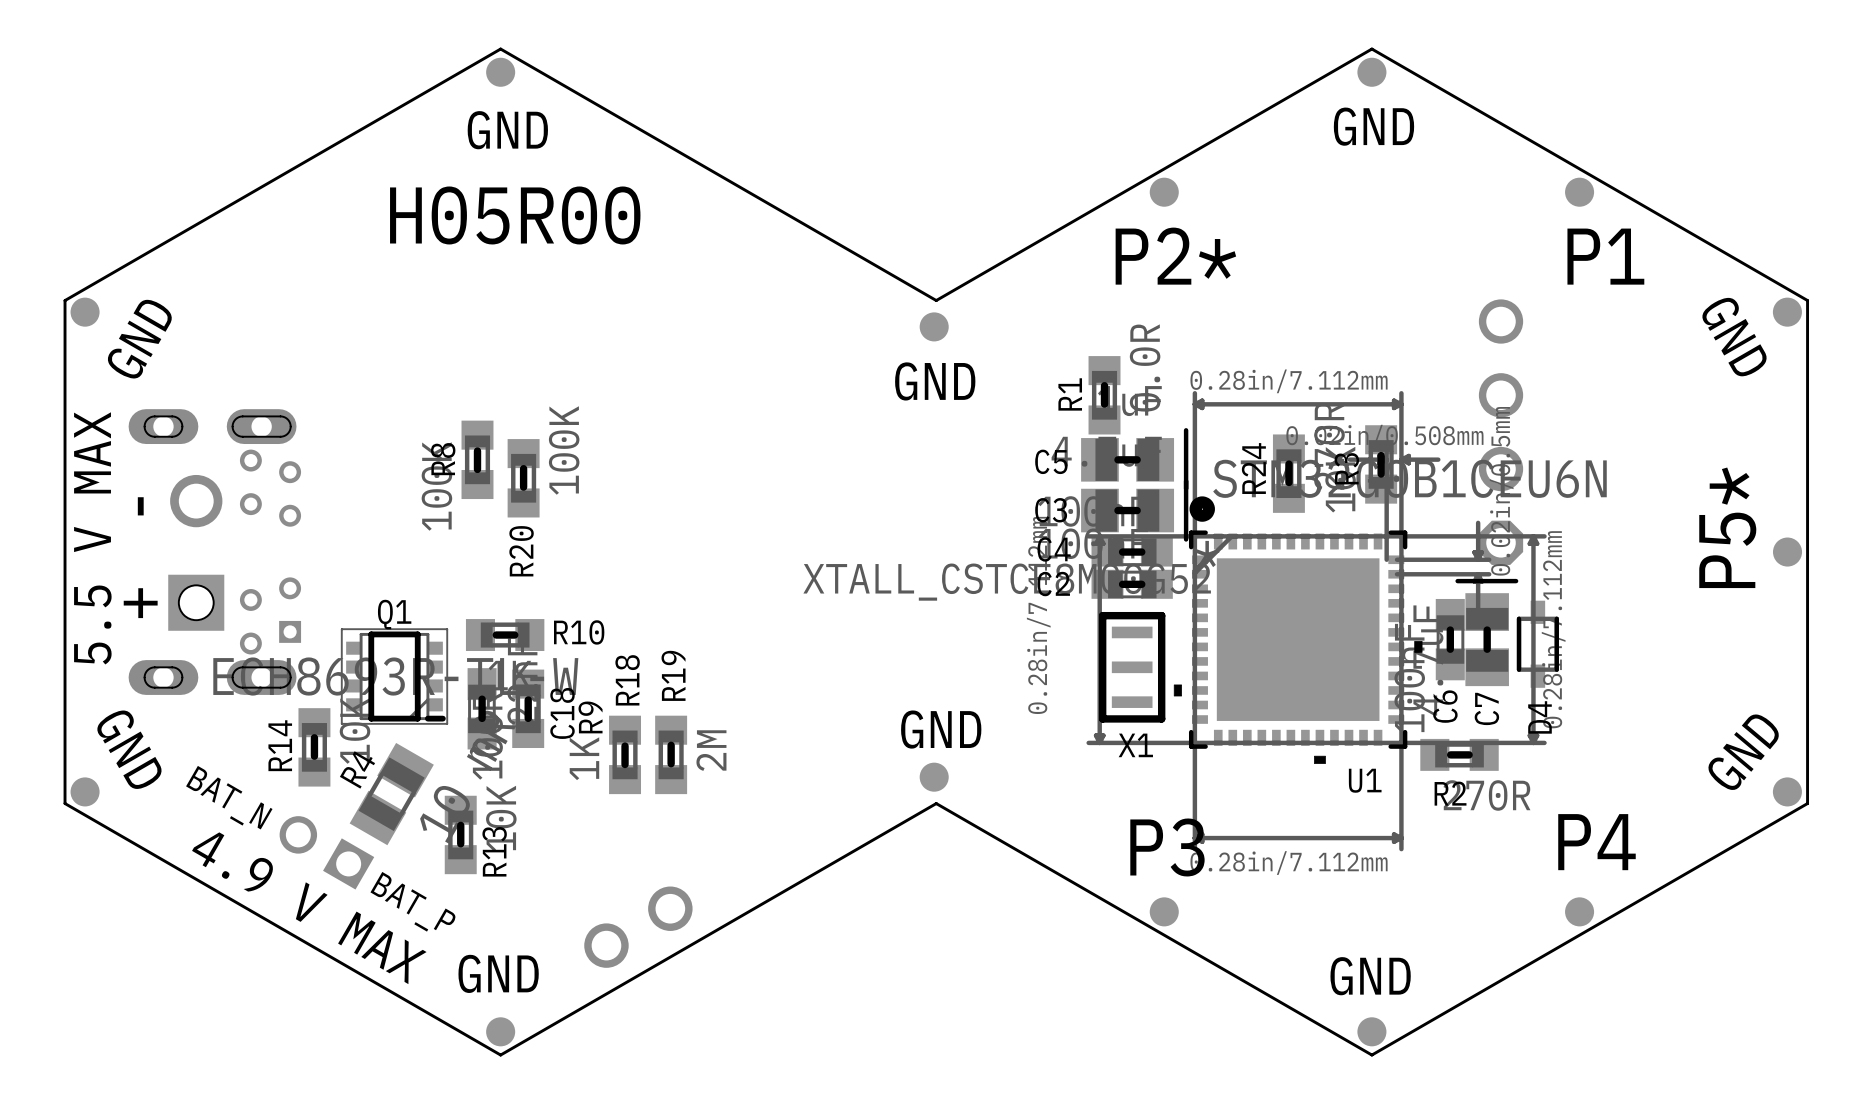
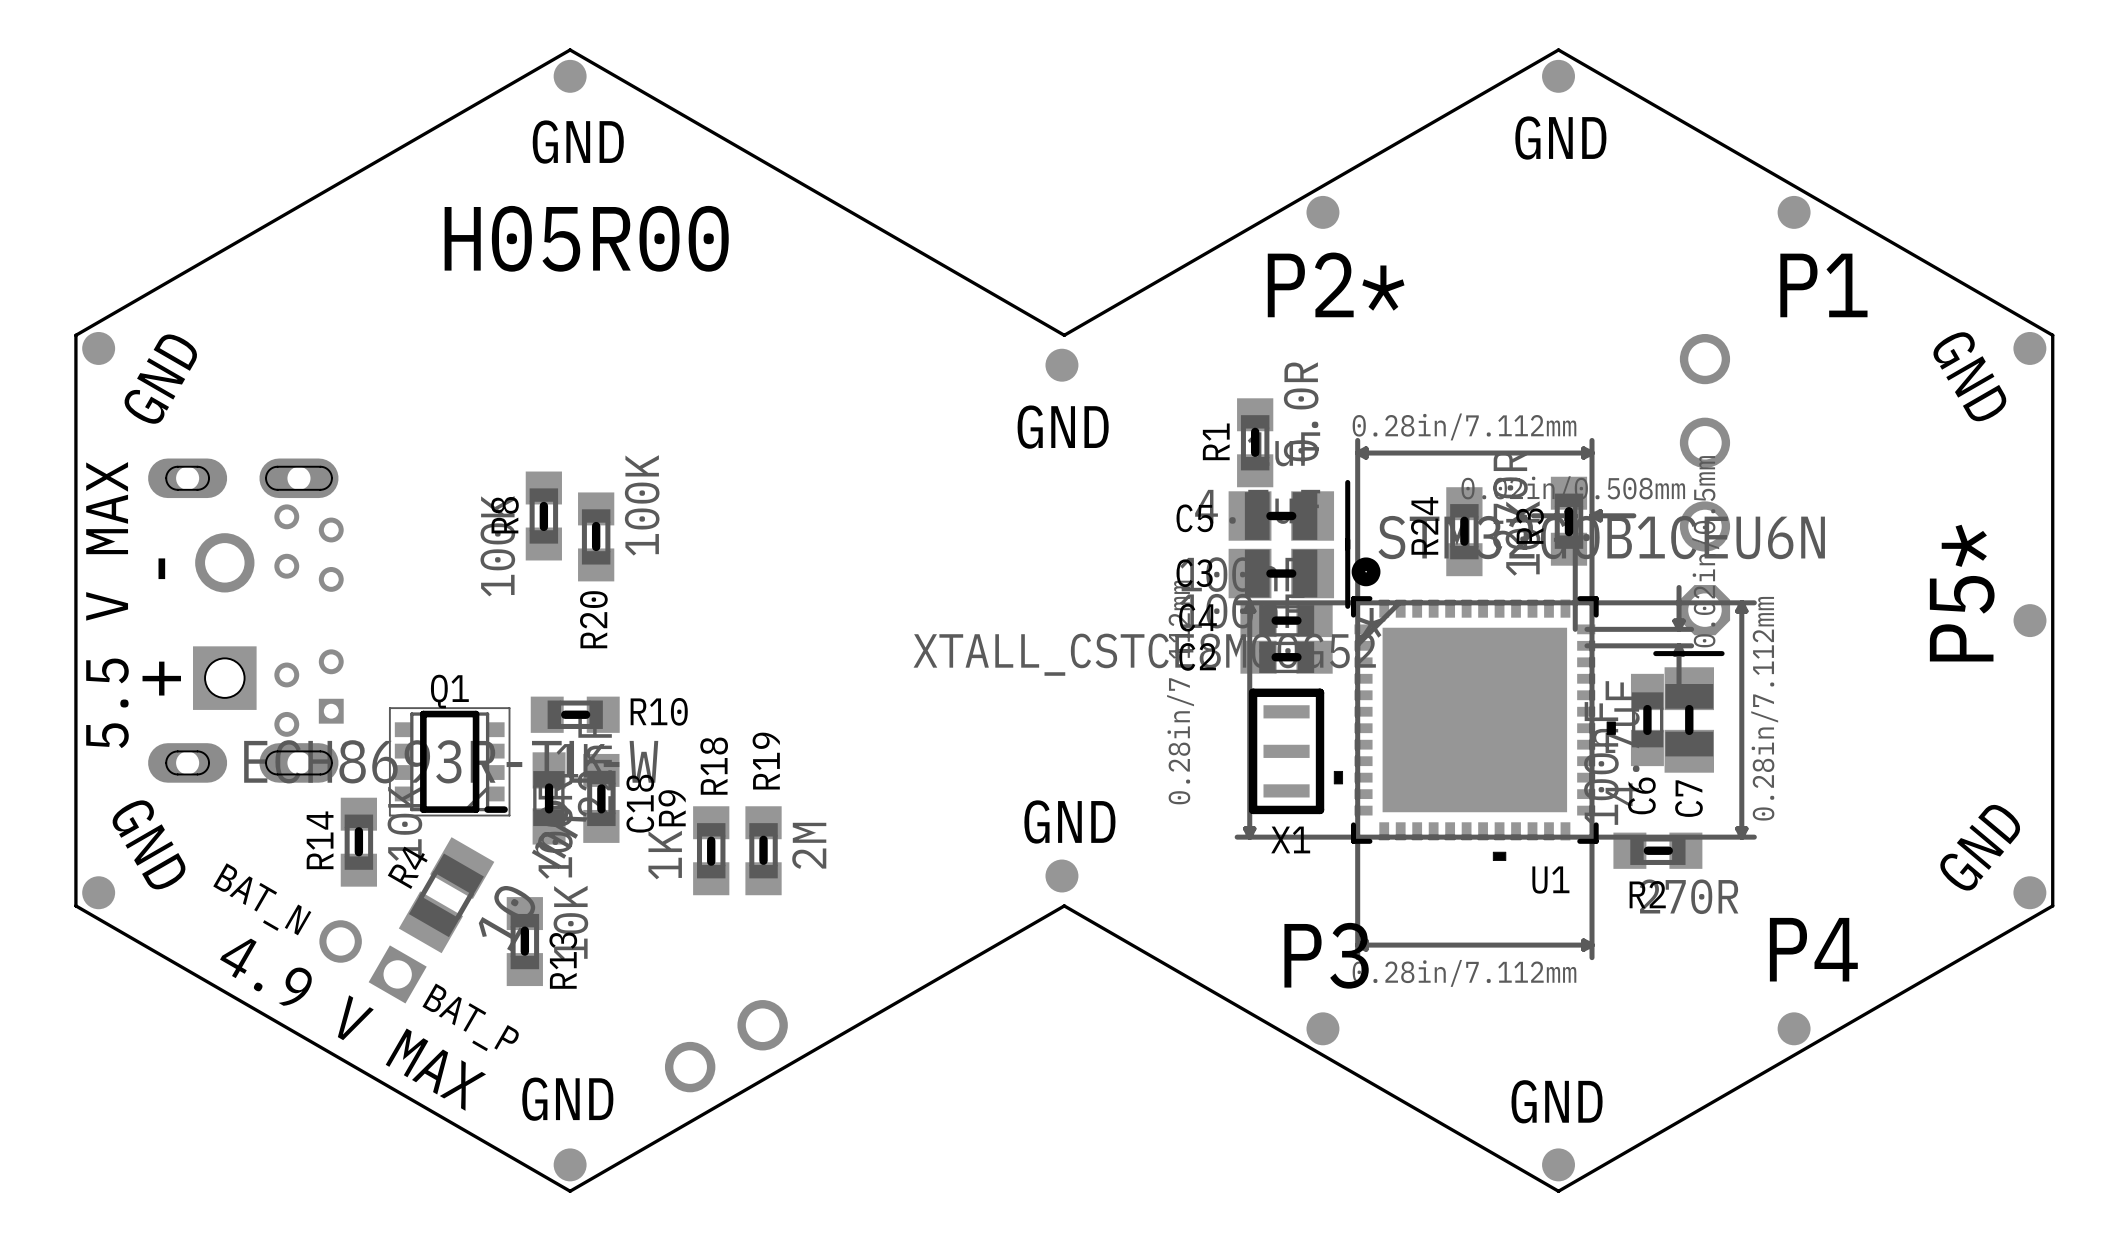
D4: (1537, 644) -> none

